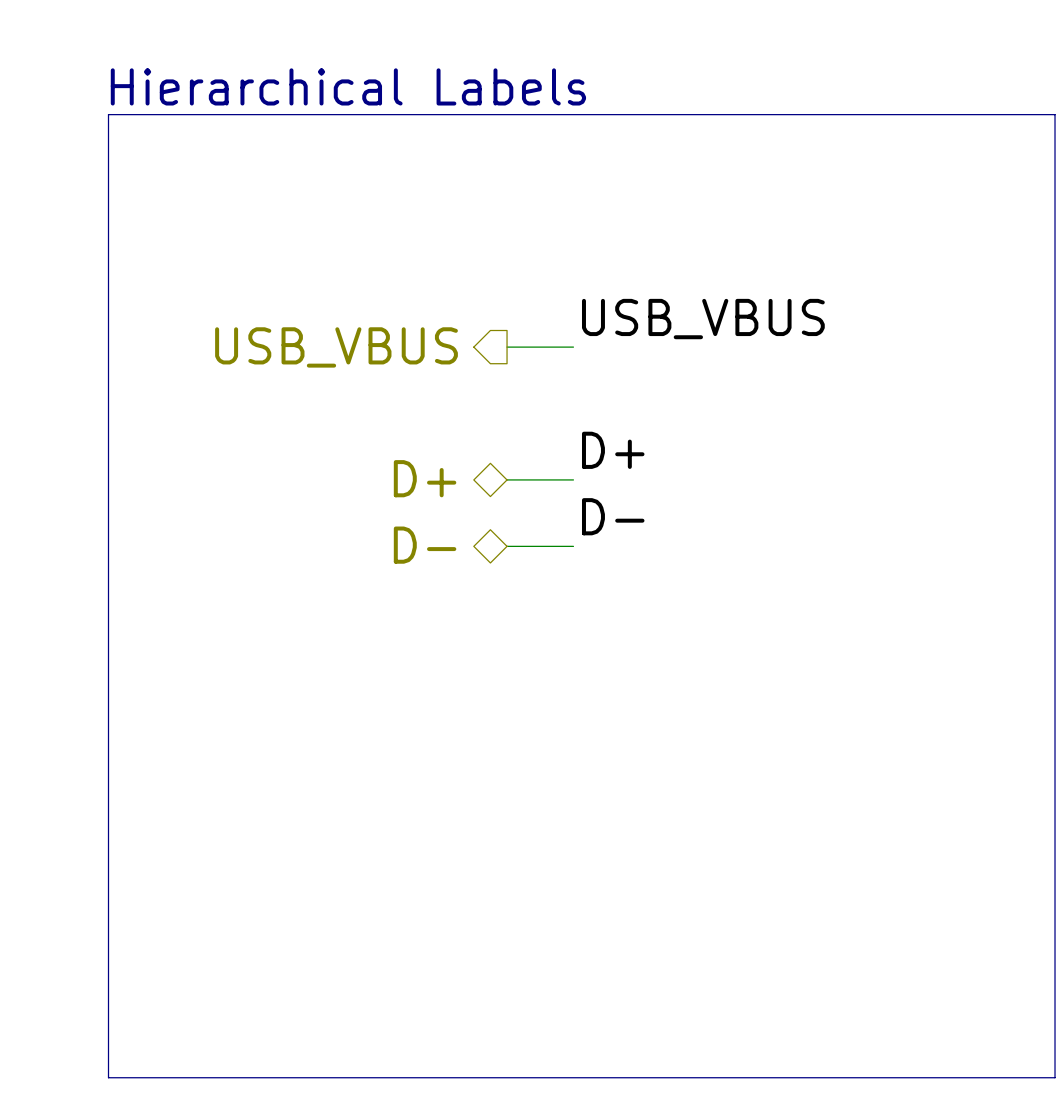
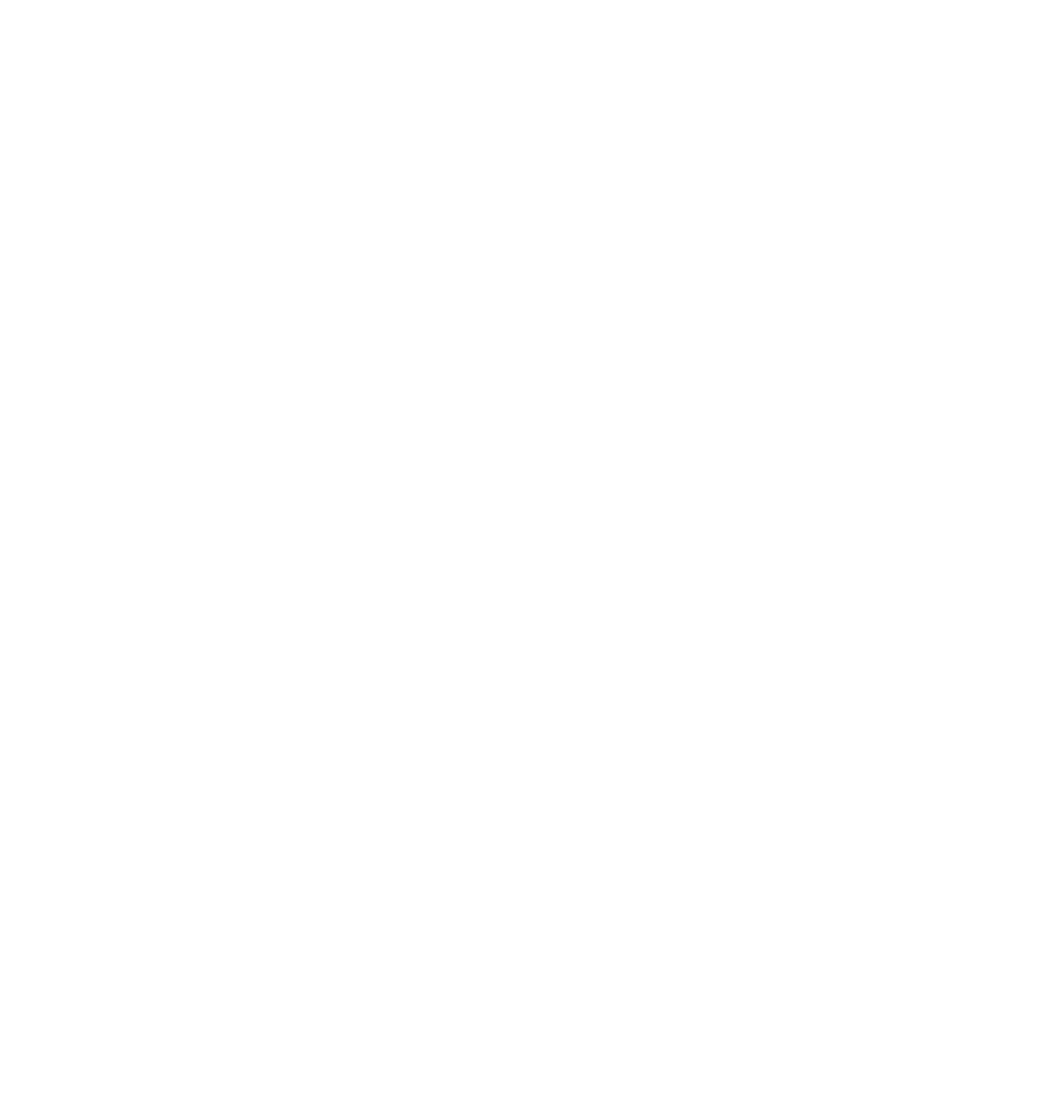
text: Hierarchical Labels (348, 86) -> none
line: (108, 114) (1055, 114) (1055, 1077) (108, 1077) (108, 114) -> none
label: USB_VBUS (703, 319) -> none
hierarchical label: USB_VBUS (336, 347) -> none
wire: (507, 347) (573, 347) -> none
label: D+ (613, 450) -> none
hierarchical label: D+ (425, 478) -> none
wire: (507, 479) (573, 479) -> none
label: D- (613, 516) -> none
hierarchical label: D- (425, 545) -> none
wire: (507, 546) (573, 546) -> none

